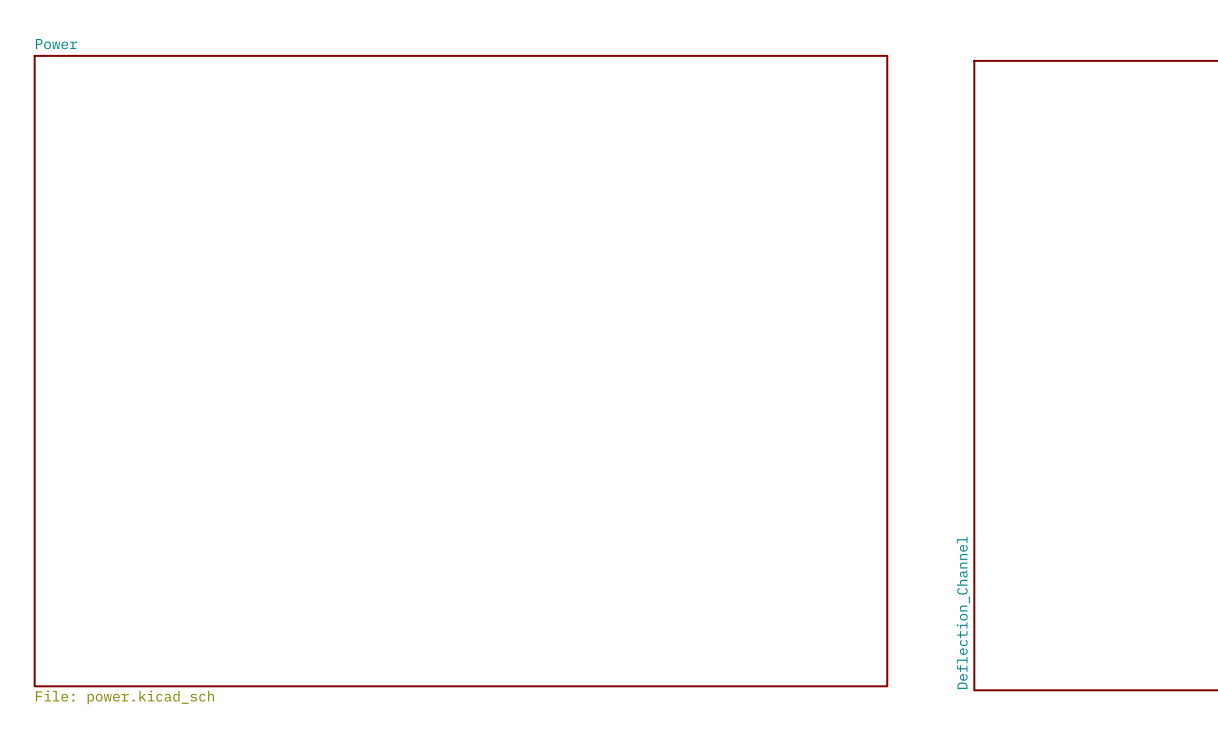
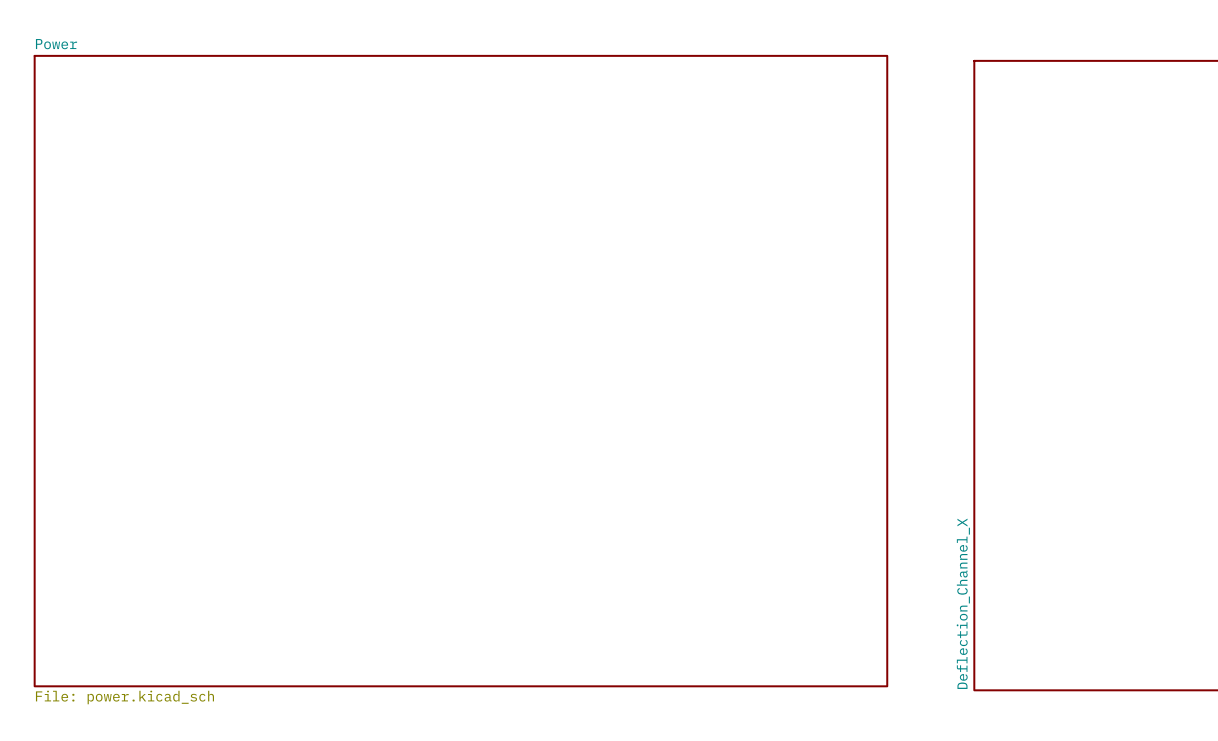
sheet Deflection_Channel name: Deflection_Channel (963, 612) -> Deflection_Channel_X (963, 603)

